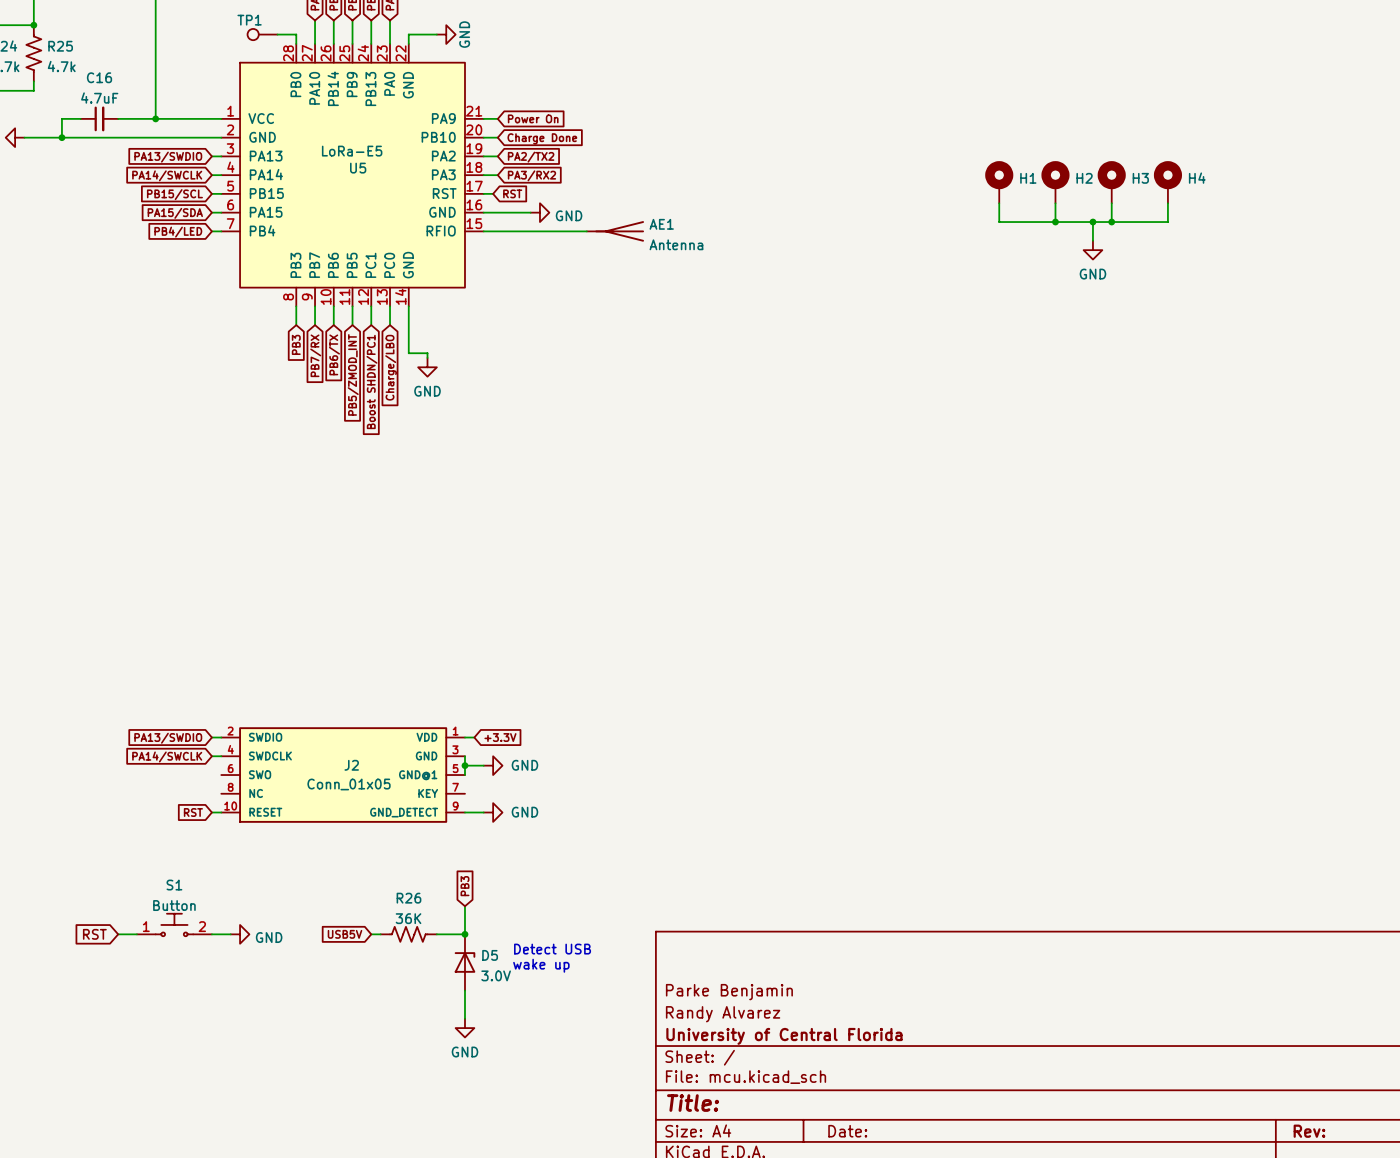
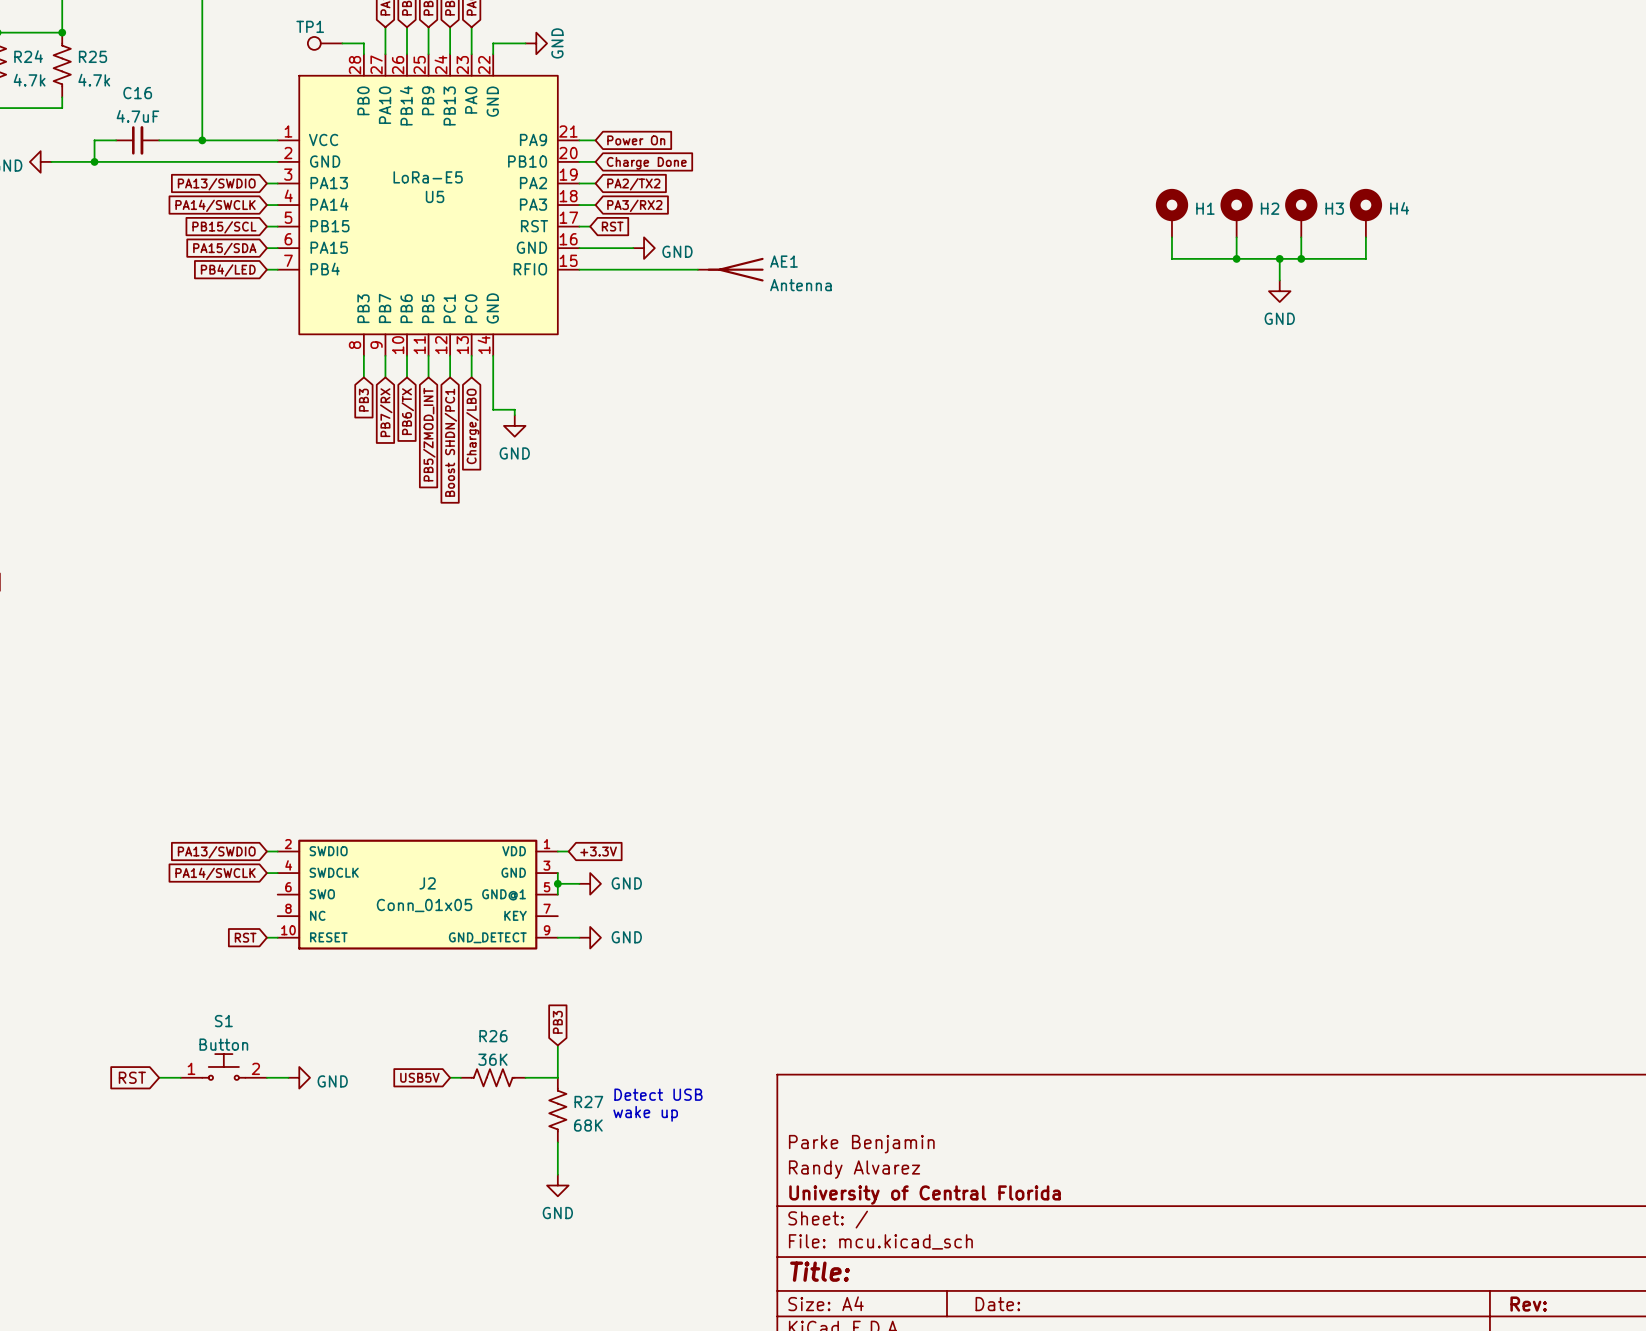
junction: (464, 934) -> none
D5: 3.0V (464, 962) -> none
R27: none -> 68K (557, 1110)

